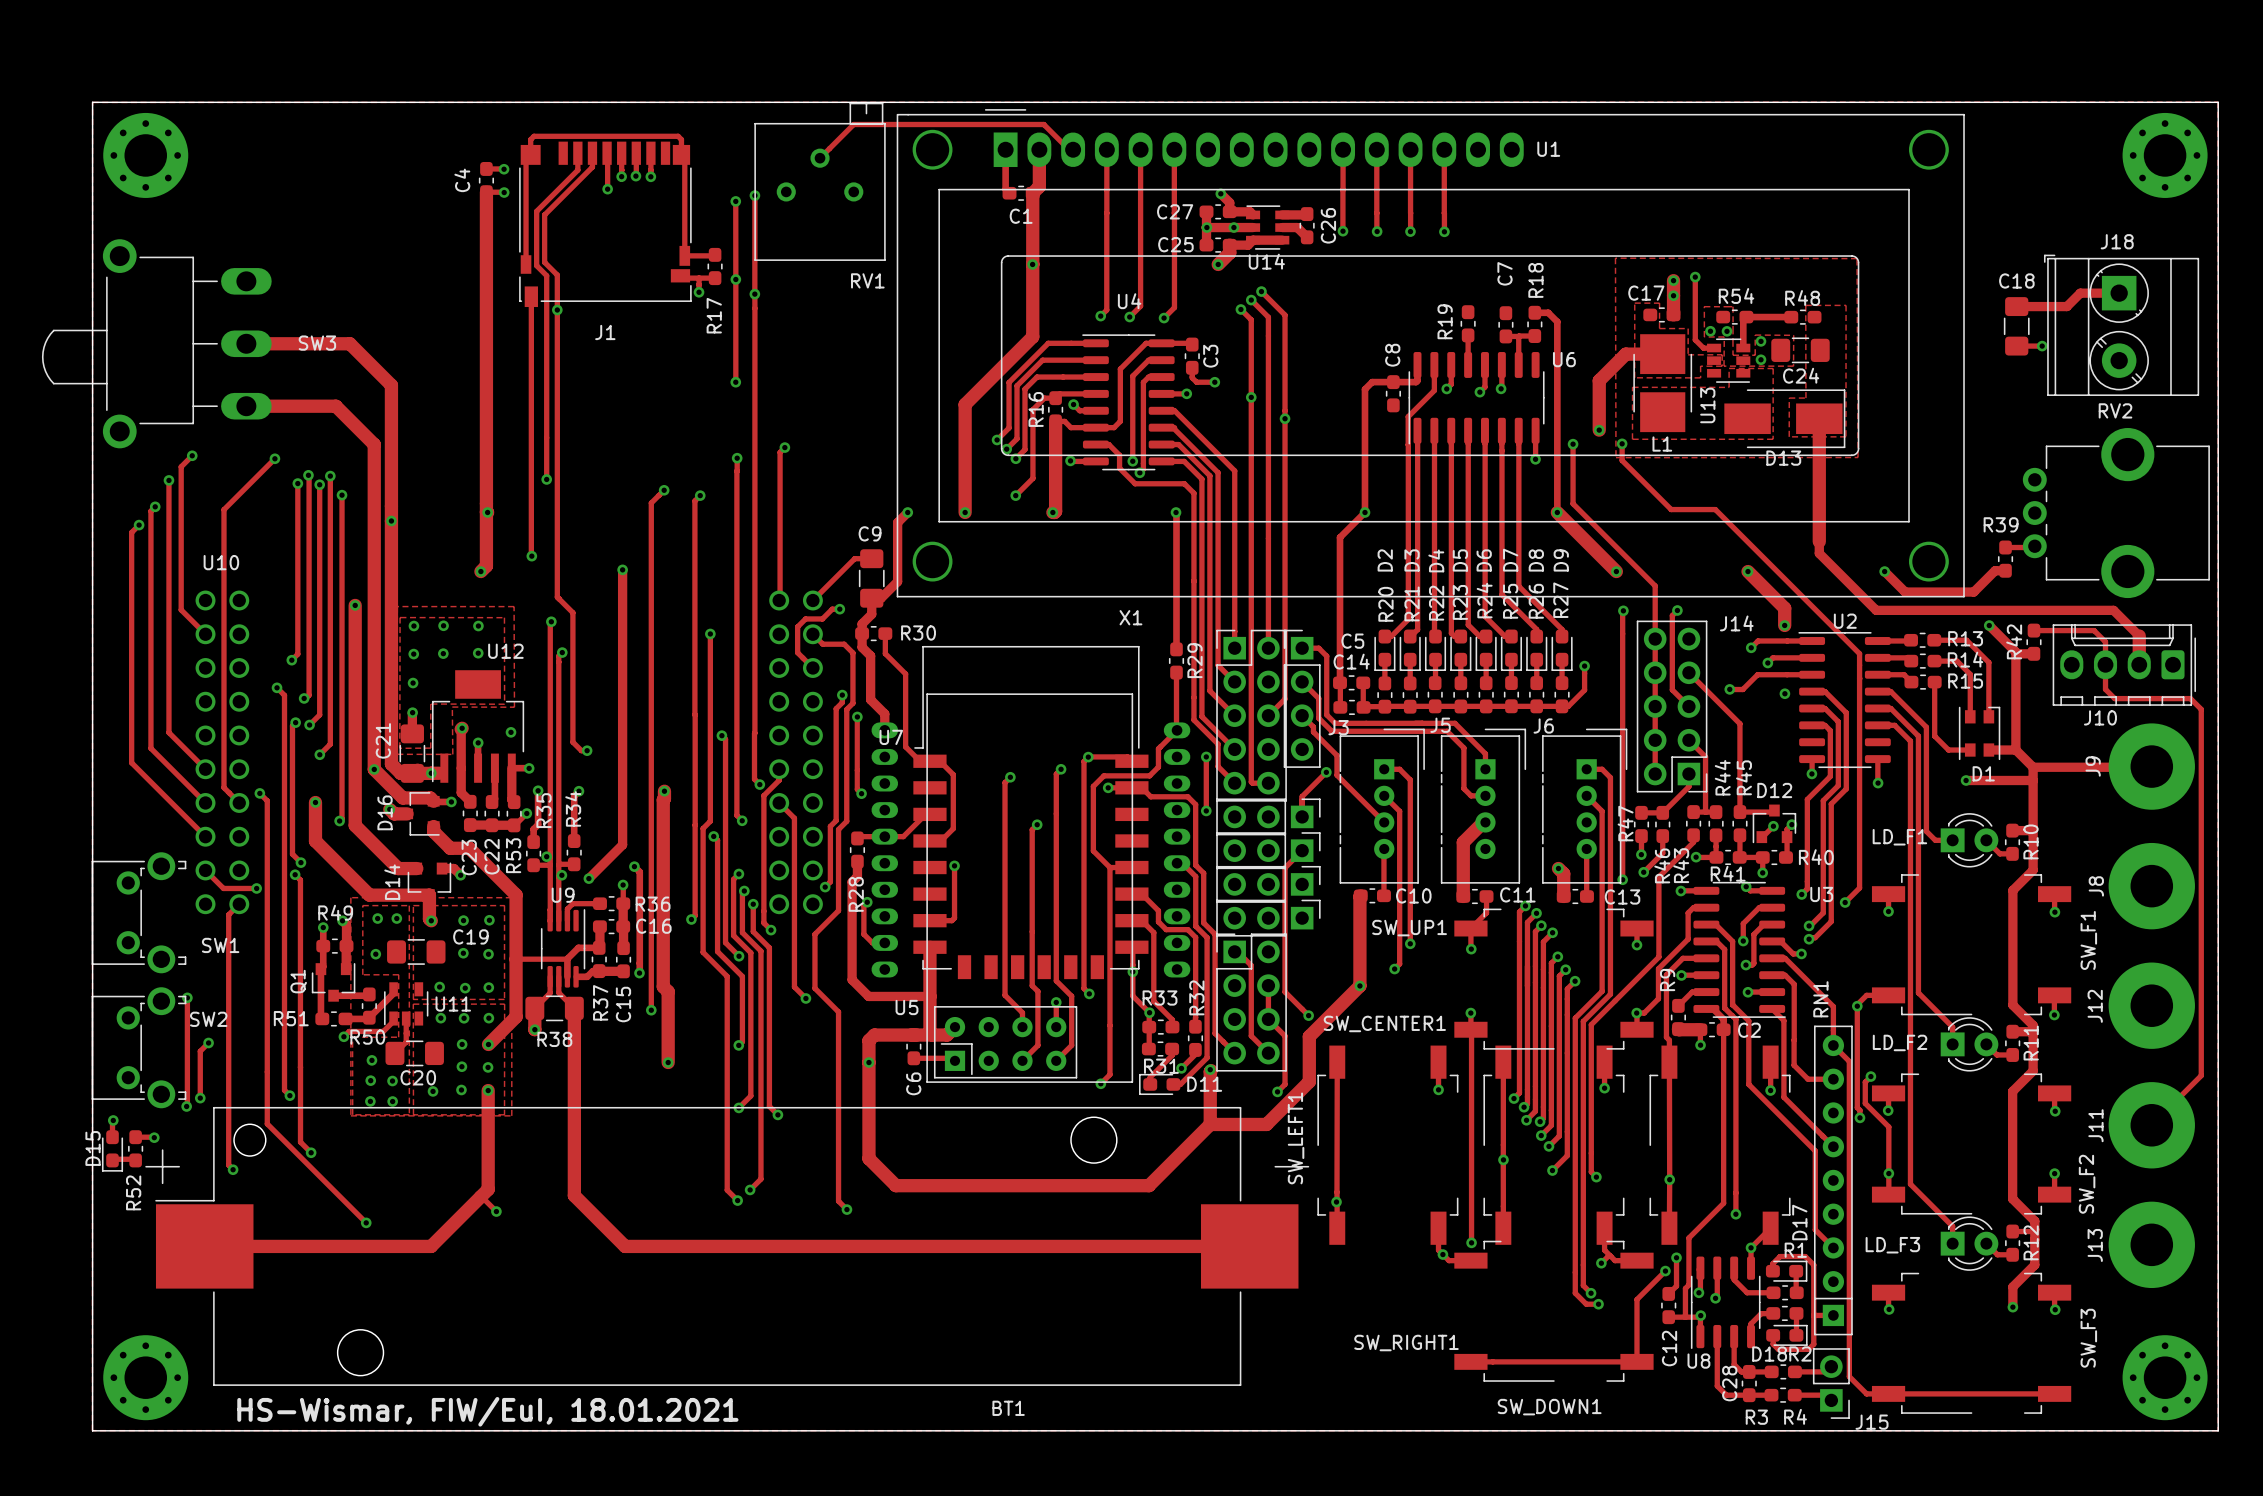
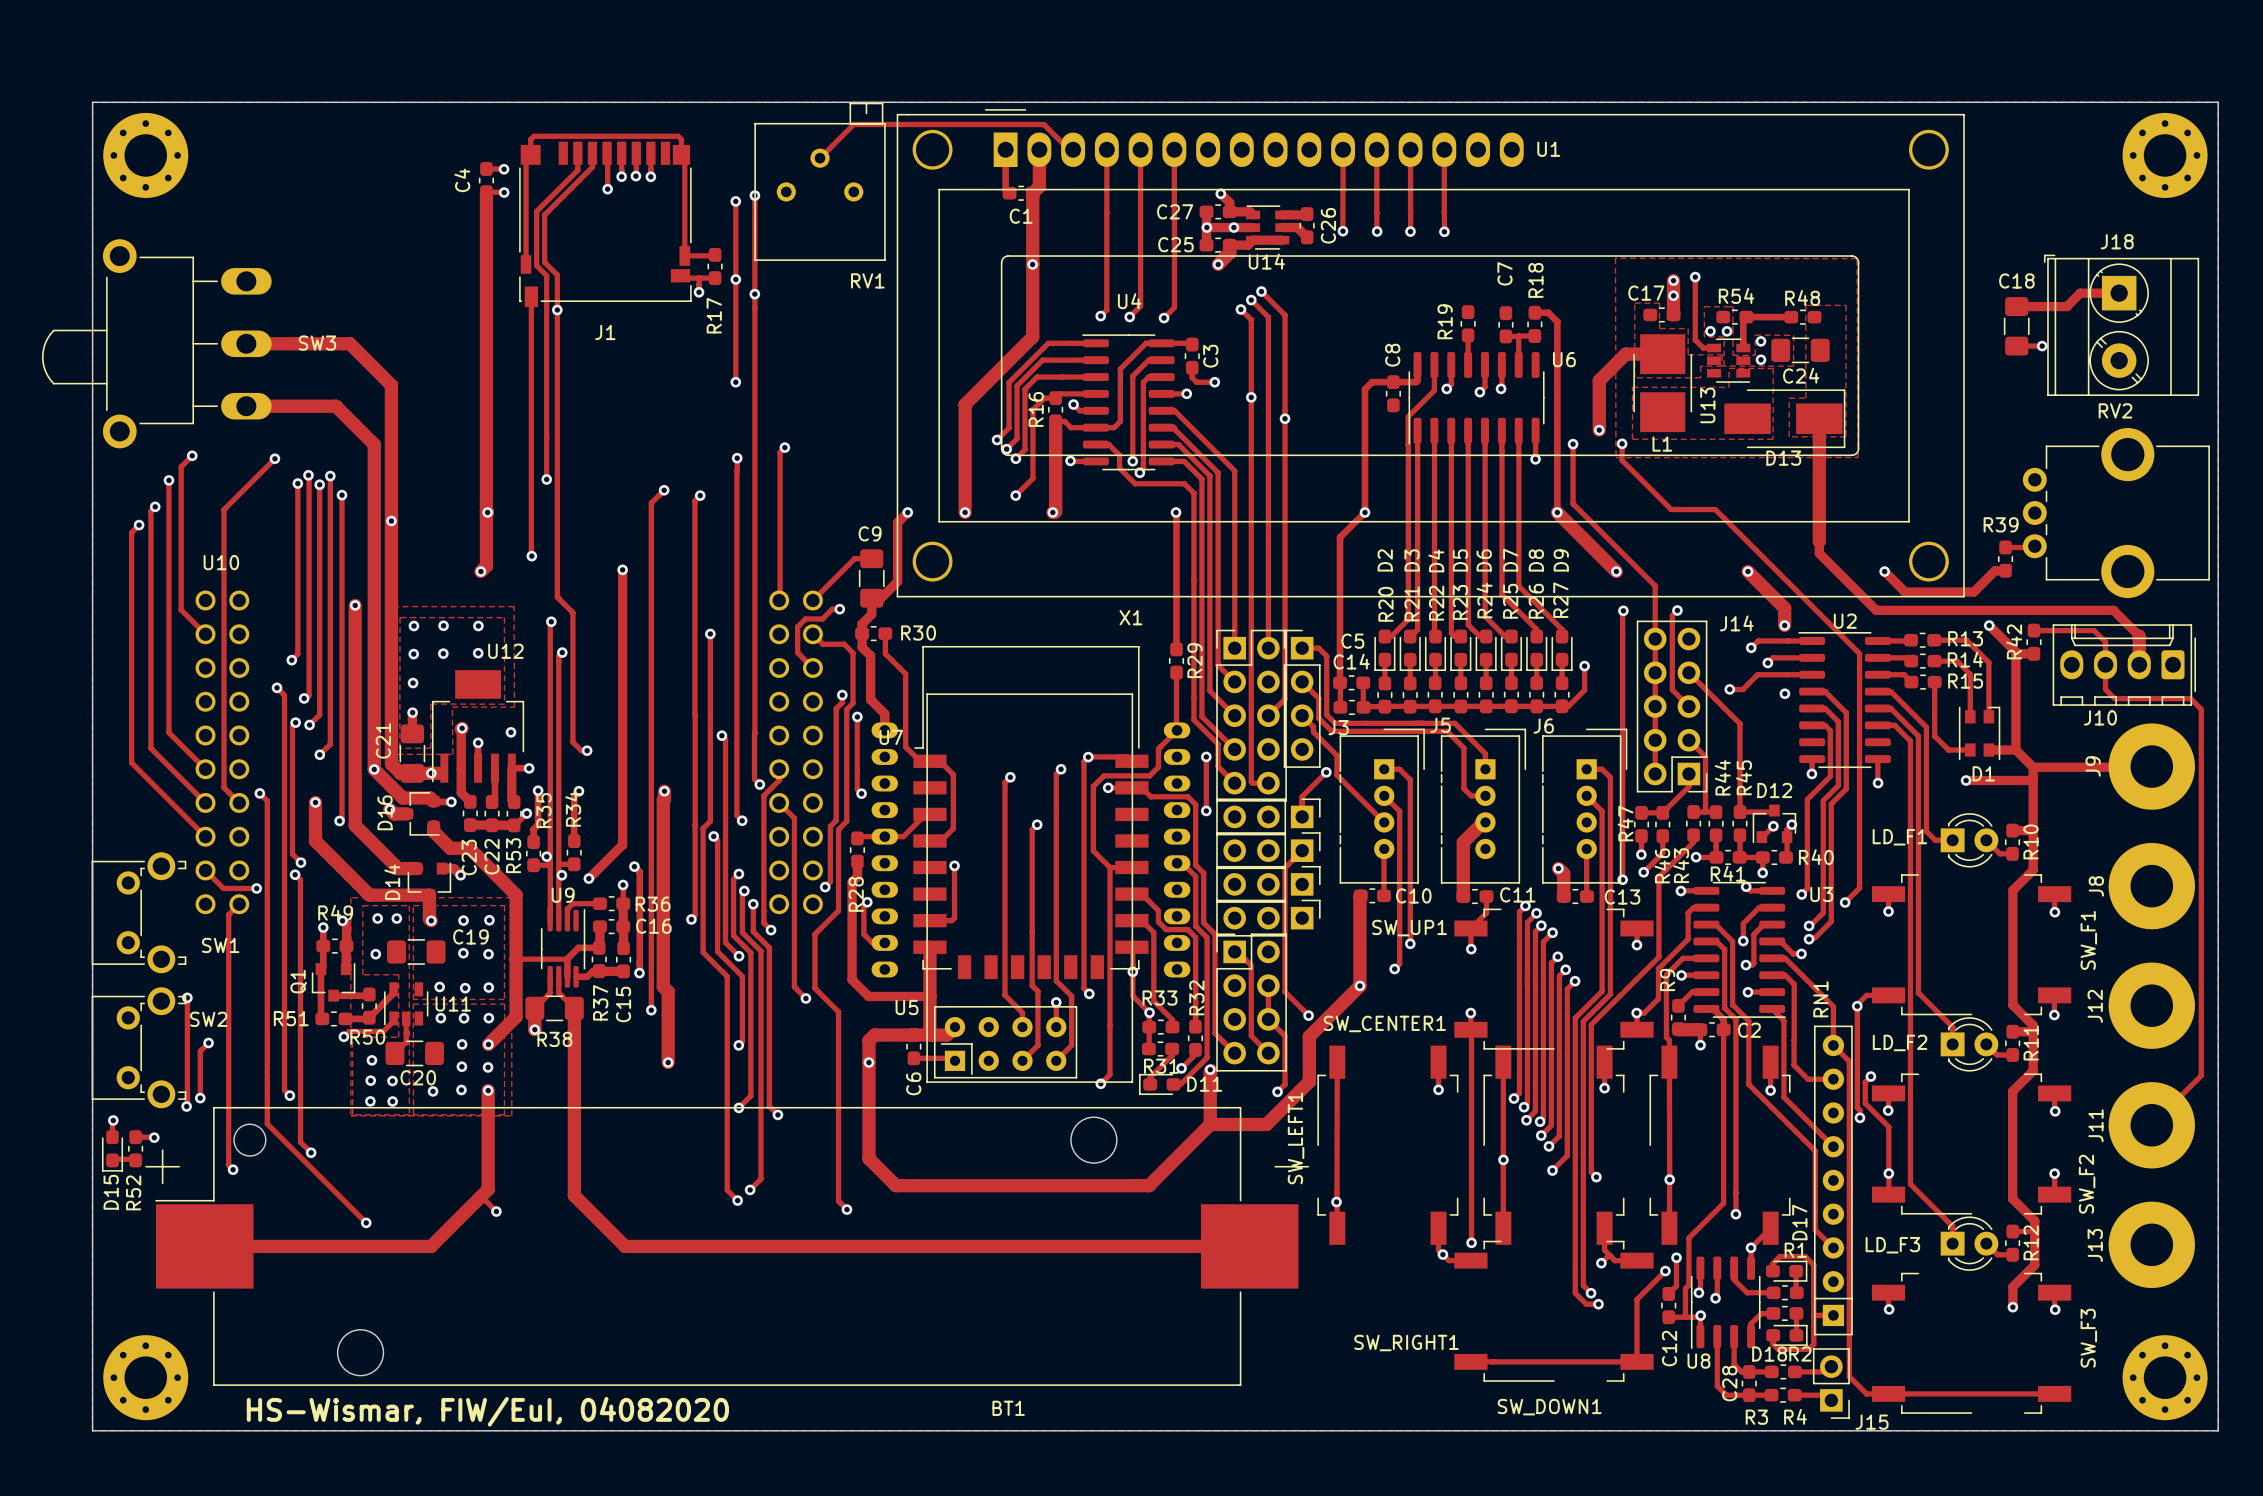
D15 name position: D15 (93, 1148) -> D15 (111, 1192)
text: HS-Wismar, FIW/EuI, 18.01.2021 (487, 1411) -> HS-Wismar, FIW/EuI, 04082020 (487, 1411)

